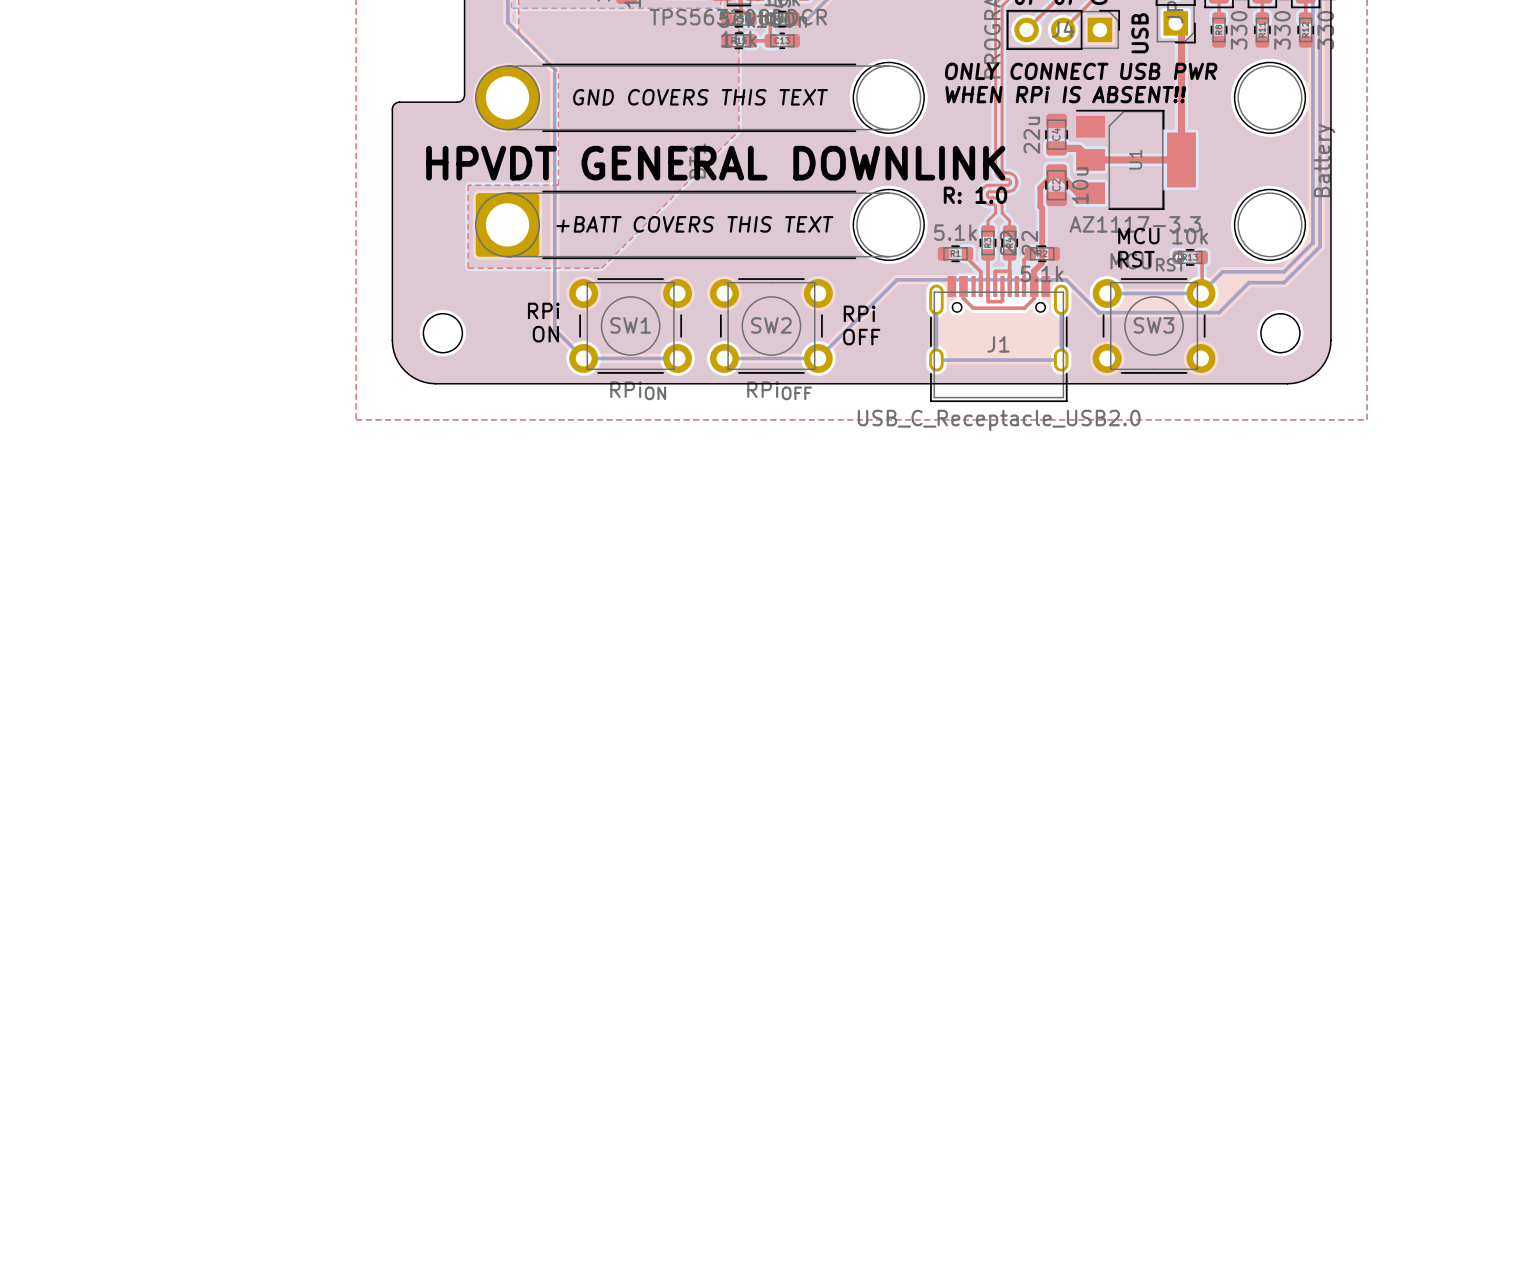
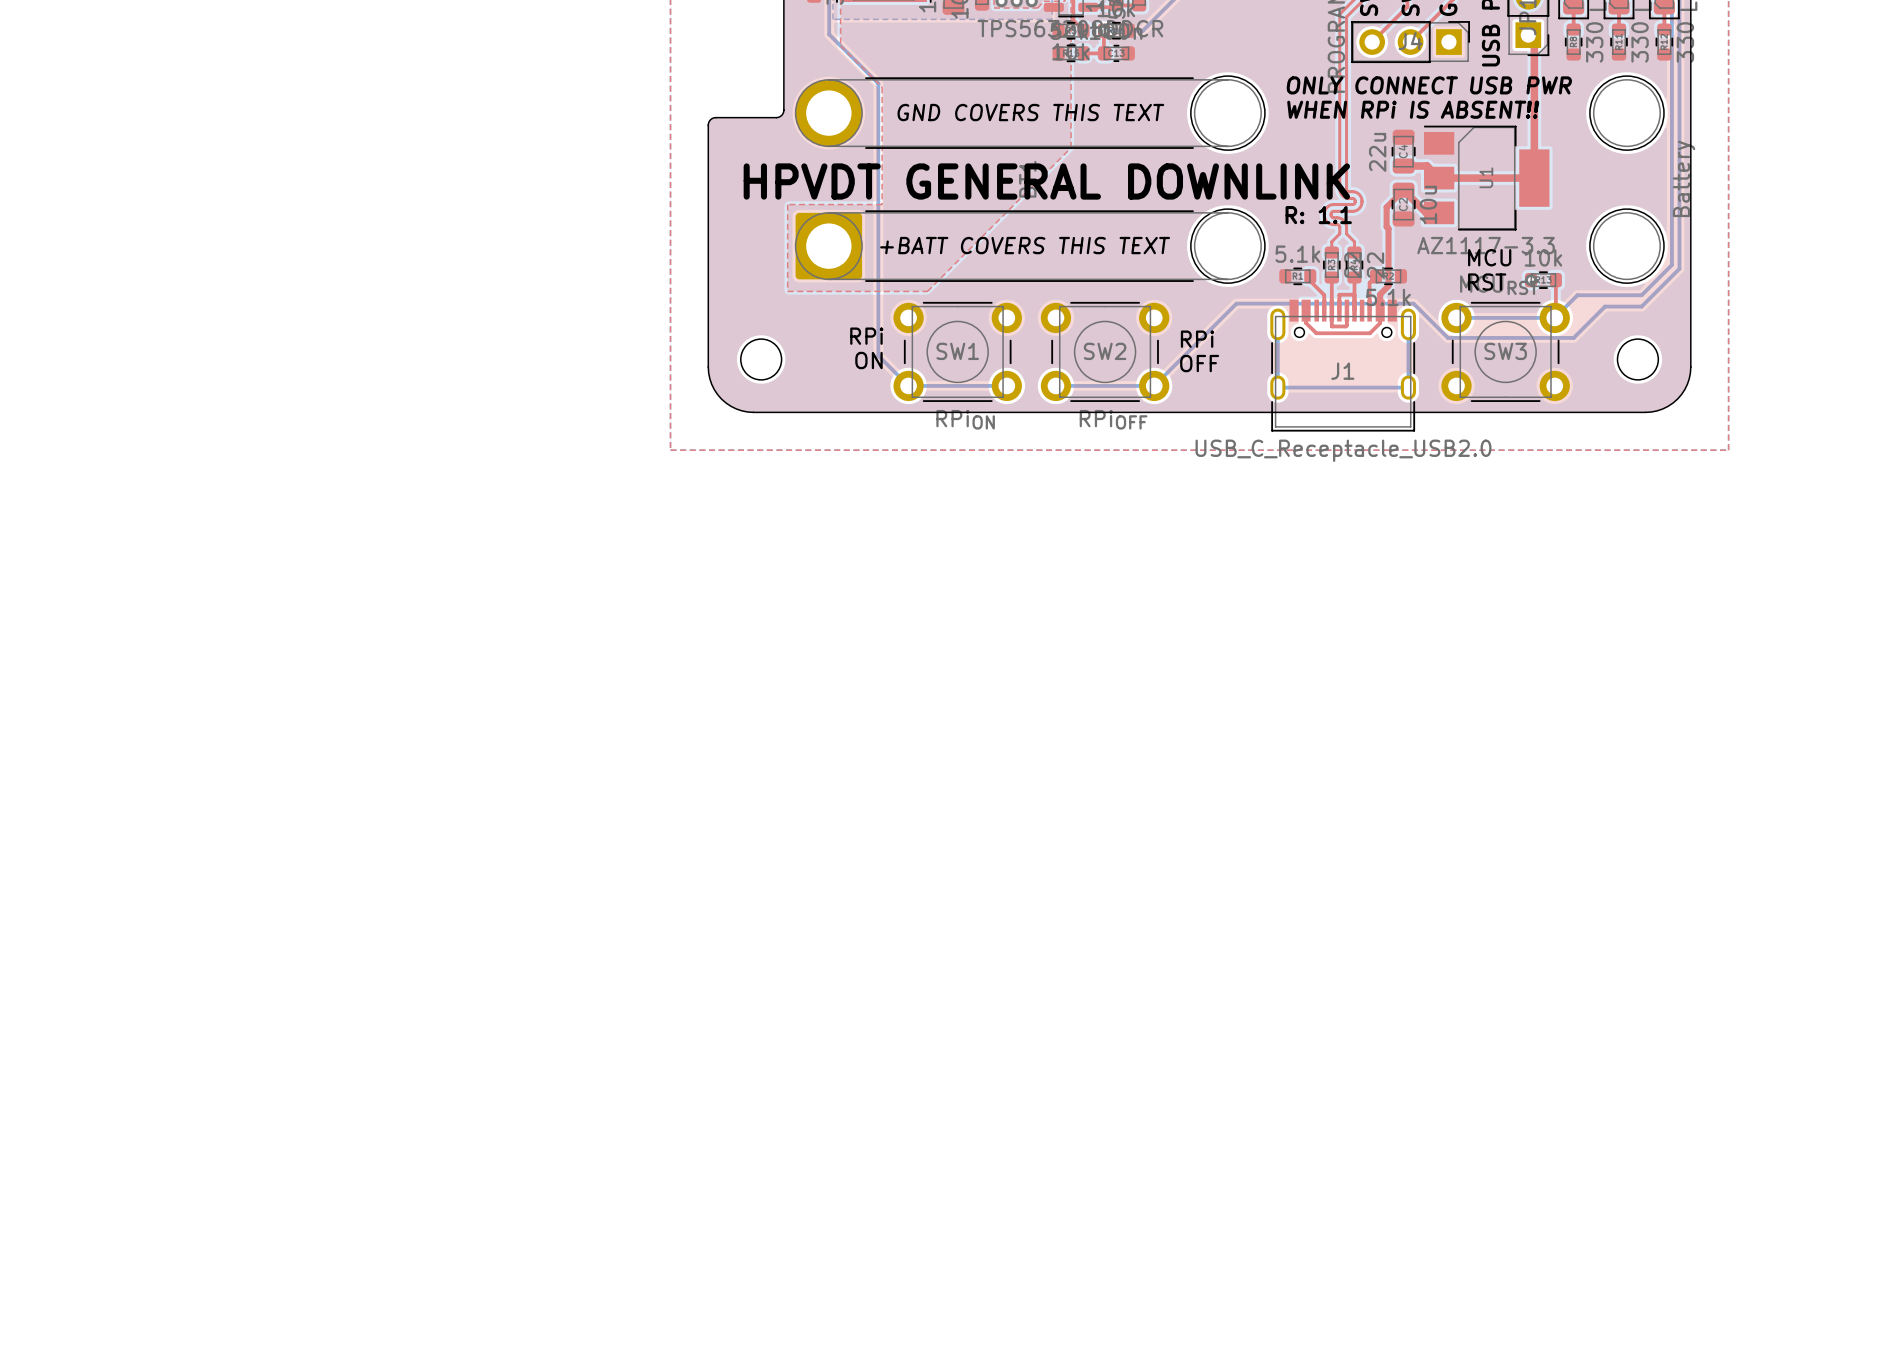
text: R: 1.0 (975, 195) -> R: 1.1 (1318, 215)

